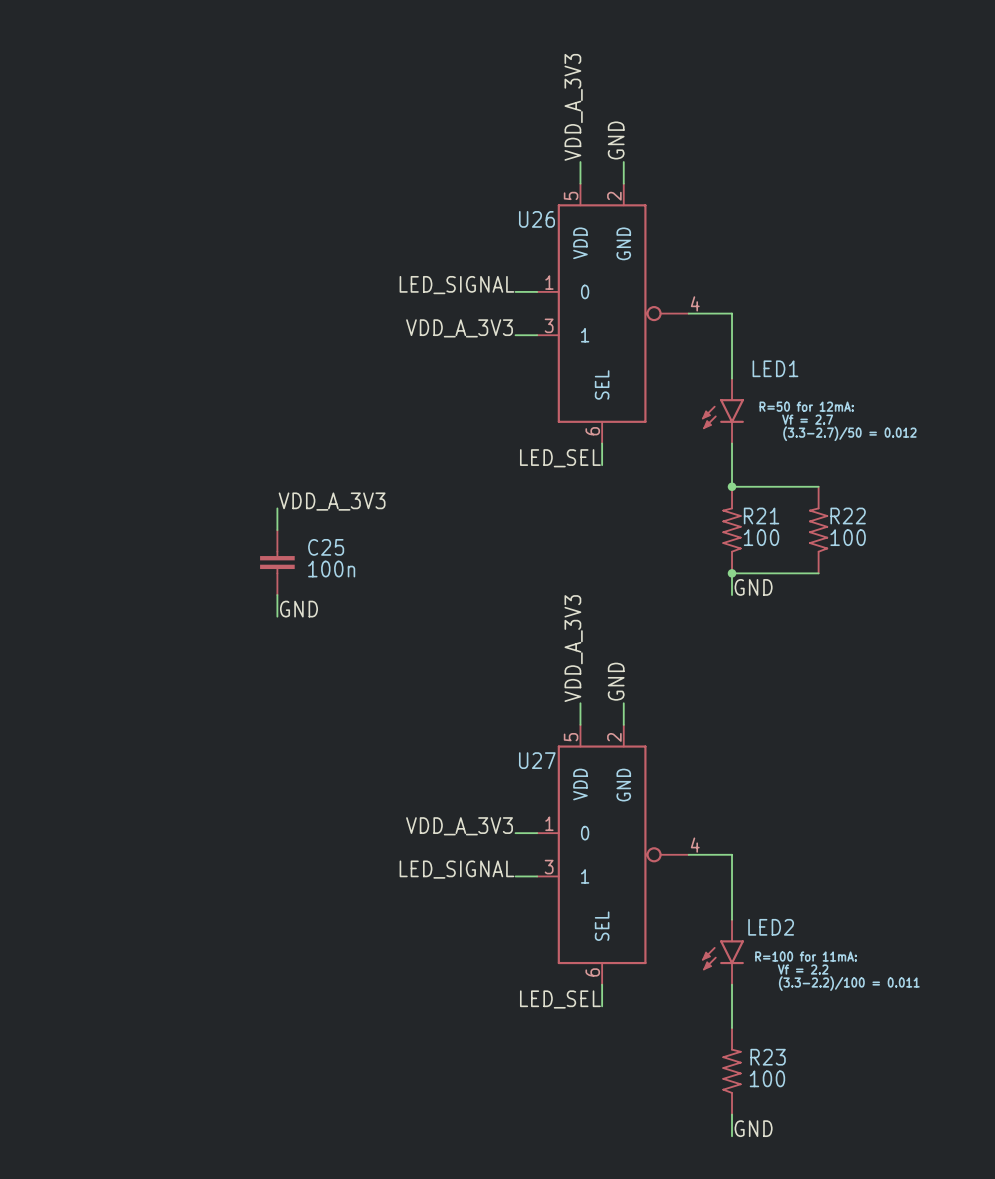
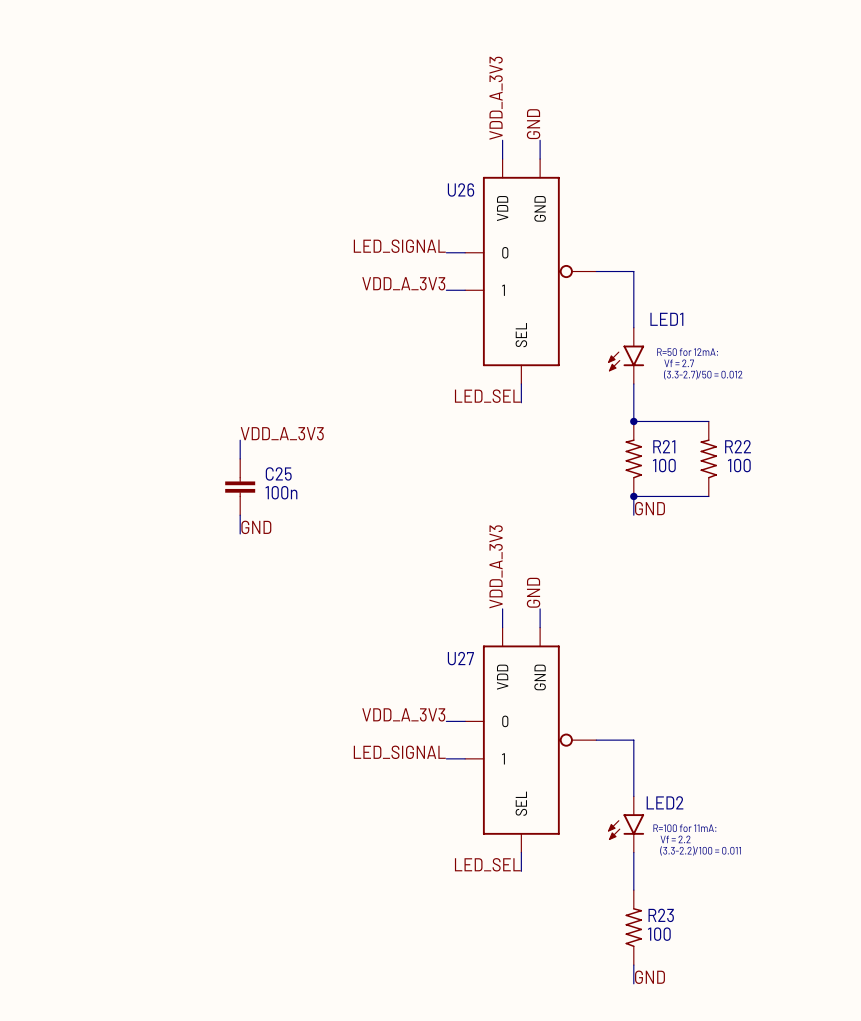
U26 pin number: 5 (571, 195) -> none
U26 pin number: 2 (614, 196) -> none
U26 pin number: 1 (549, 282) -> none
U26 pin number: 4 (695, 303) -> none
U26 pin number: 3 (549, 325) -> none
U26 pin number: 6 (592, 431) -> none
U27 pin number: 5 (571, 737) -> none
U27 pin number: 2 (614, 737) -> none
U27 pin number: 1 (549, 823) -> none
U27 pin number: 4 (695, 845) -> none
U27 pin number: 3 (549, 867) -> none
U27 pin number: 6 (592, 972) -> none

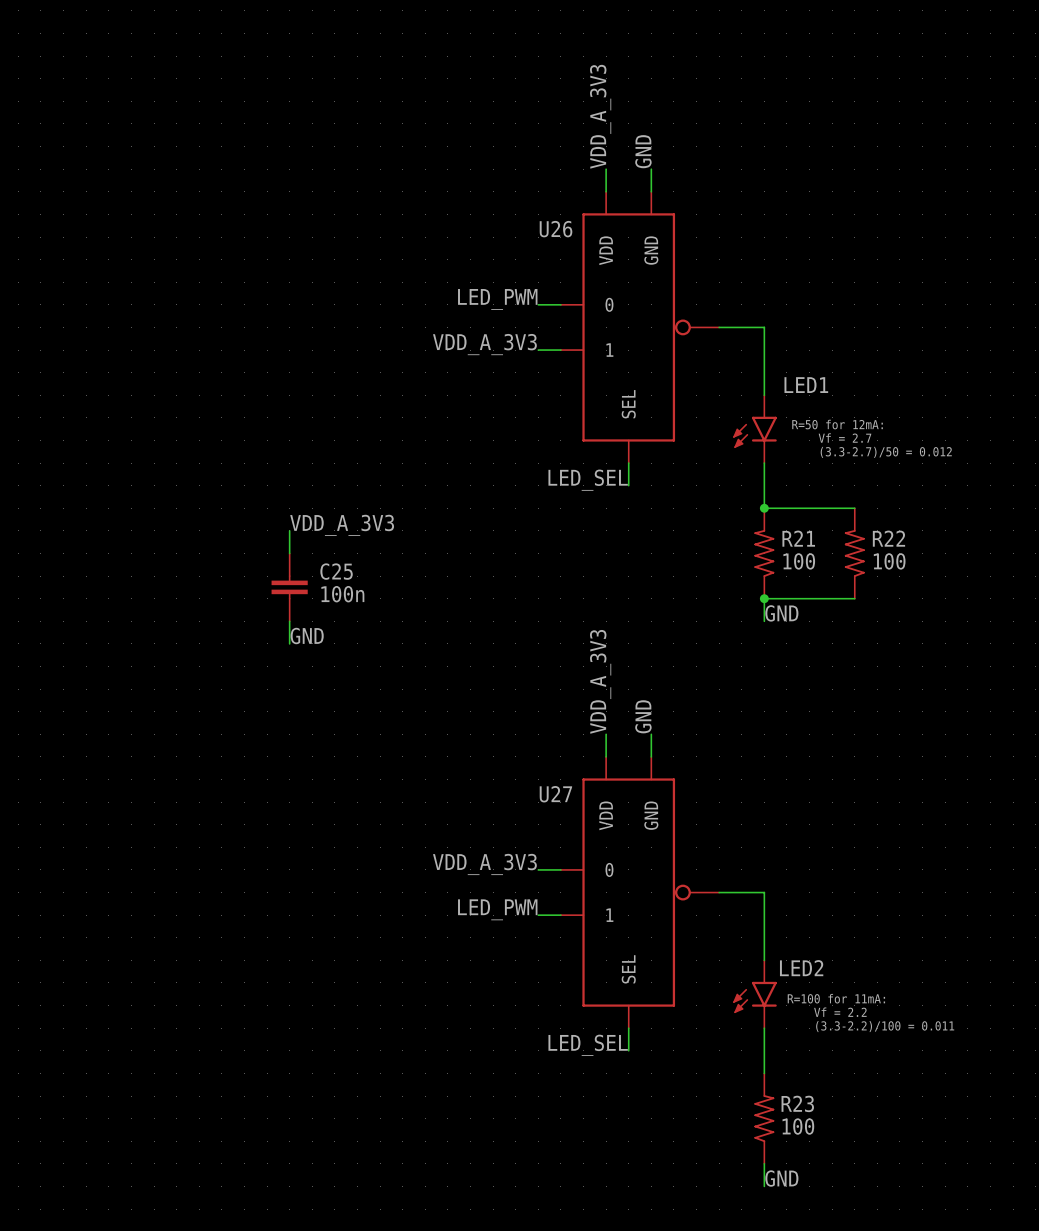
label: LED_SIGNAL (399, 246) -> LED_PWM (497, 299)
label: LED_SIGNAL (399, 752) -> LED_PWM (497, 909)

